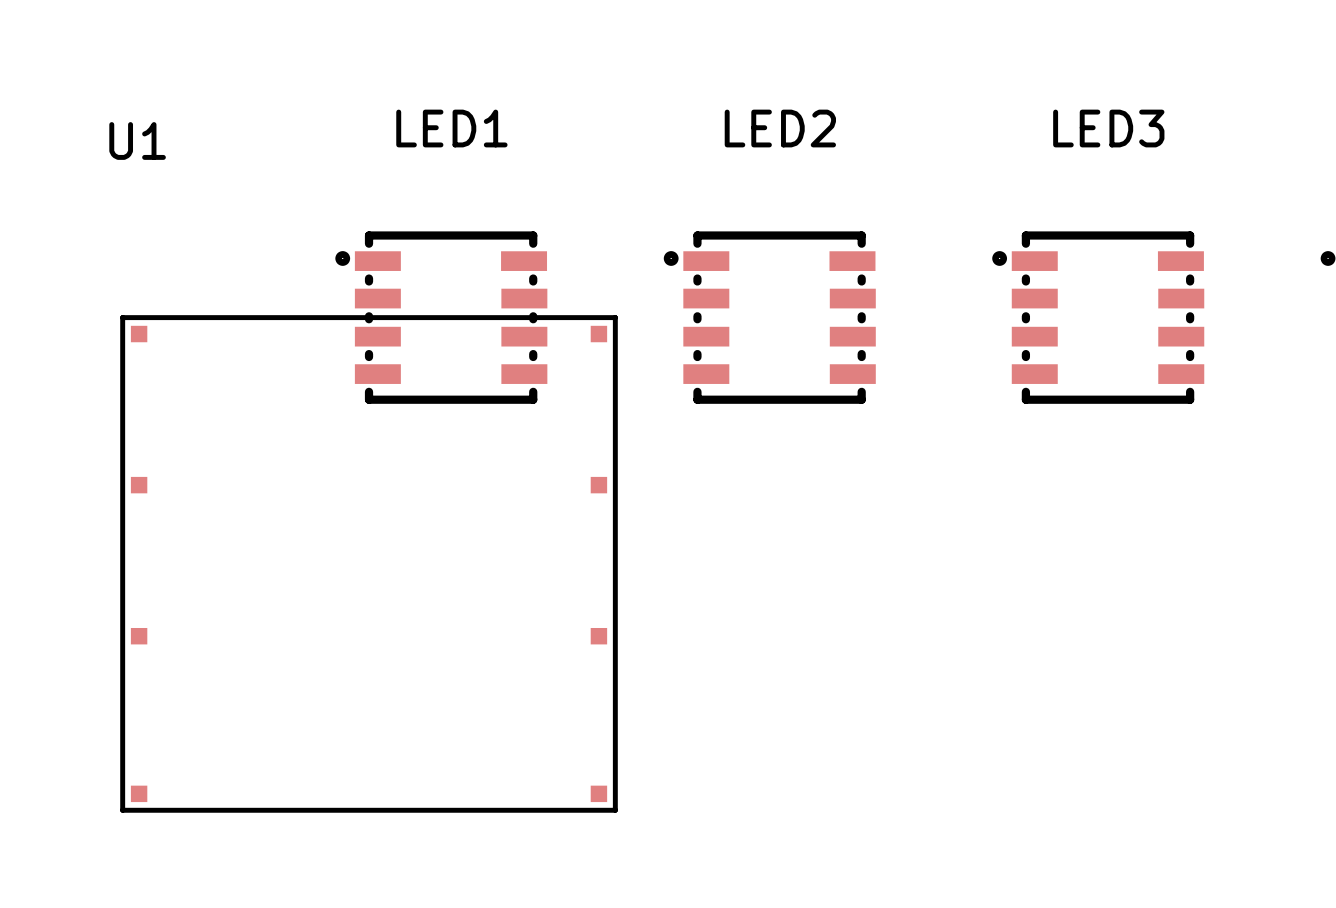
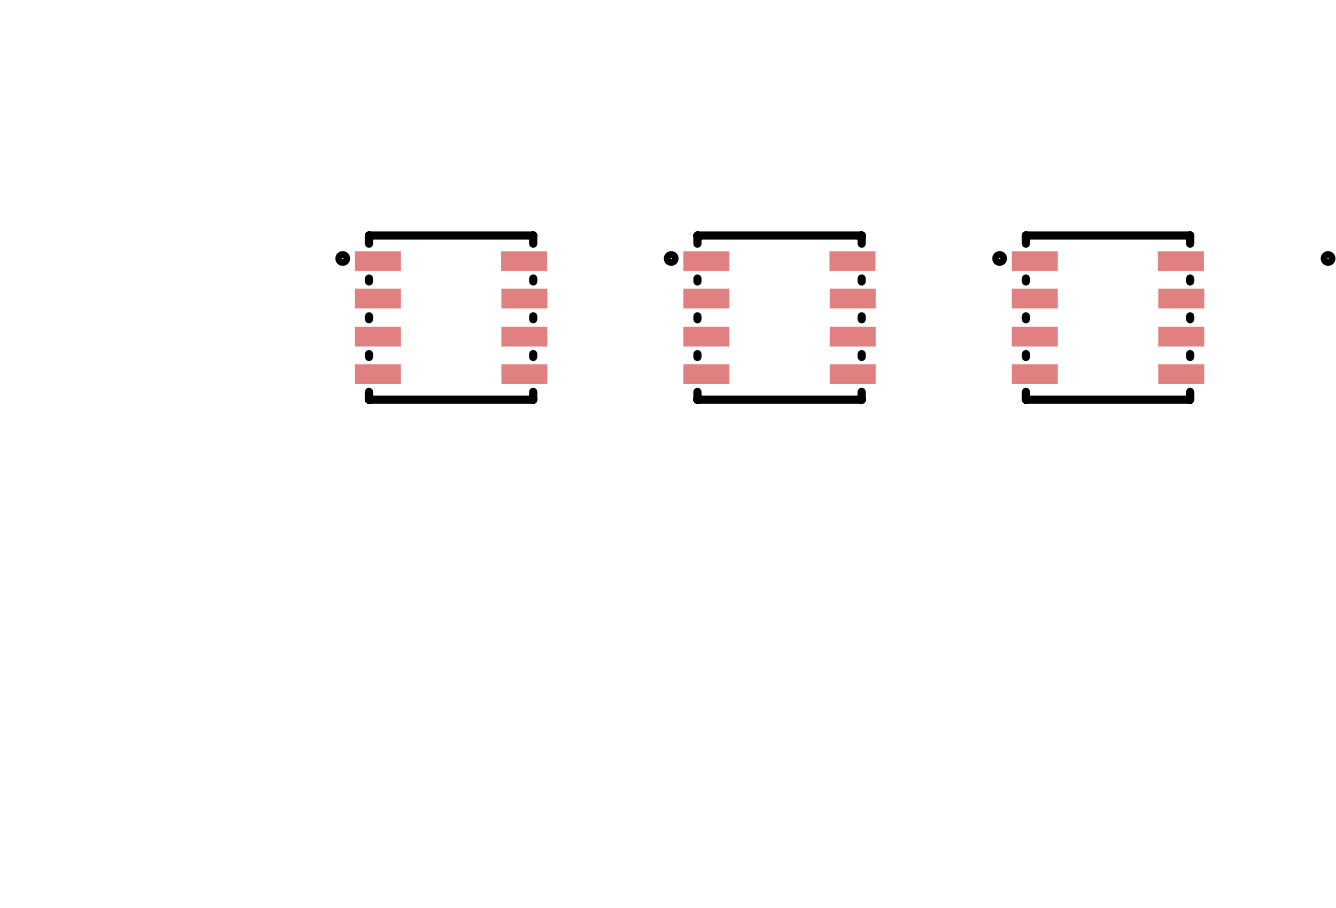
LED1 name: LED1 (451, 128) -> none
LED2 name: LED2 (780, 128) -> none
LED3 name: LED3 (1108, 128) -> none
U1: (369, 563) -> none

